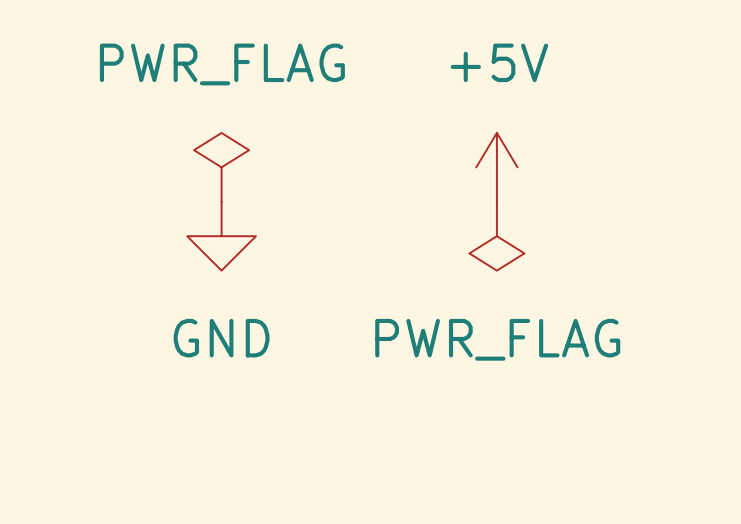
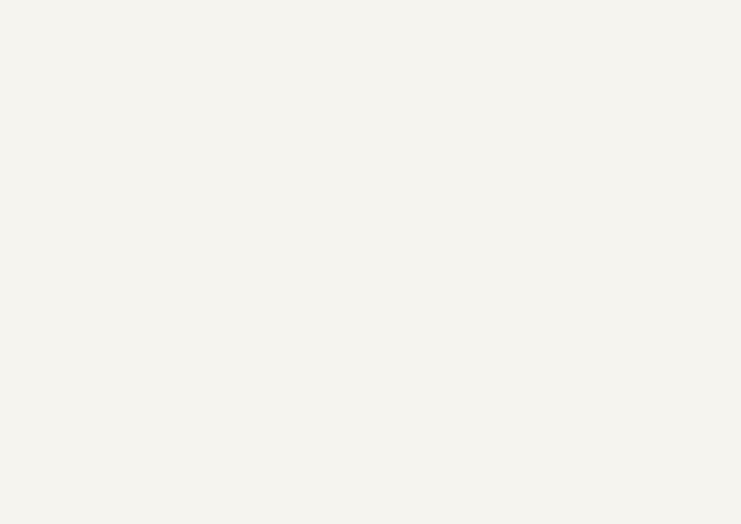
power symbol: PWR_FLAG (221, 167) -> none
power symbol: +5V (496, 167) -> none
power symbol: GND (221, 236) -> none
power symbol: PWR_FLAG (496, 236) -> none

